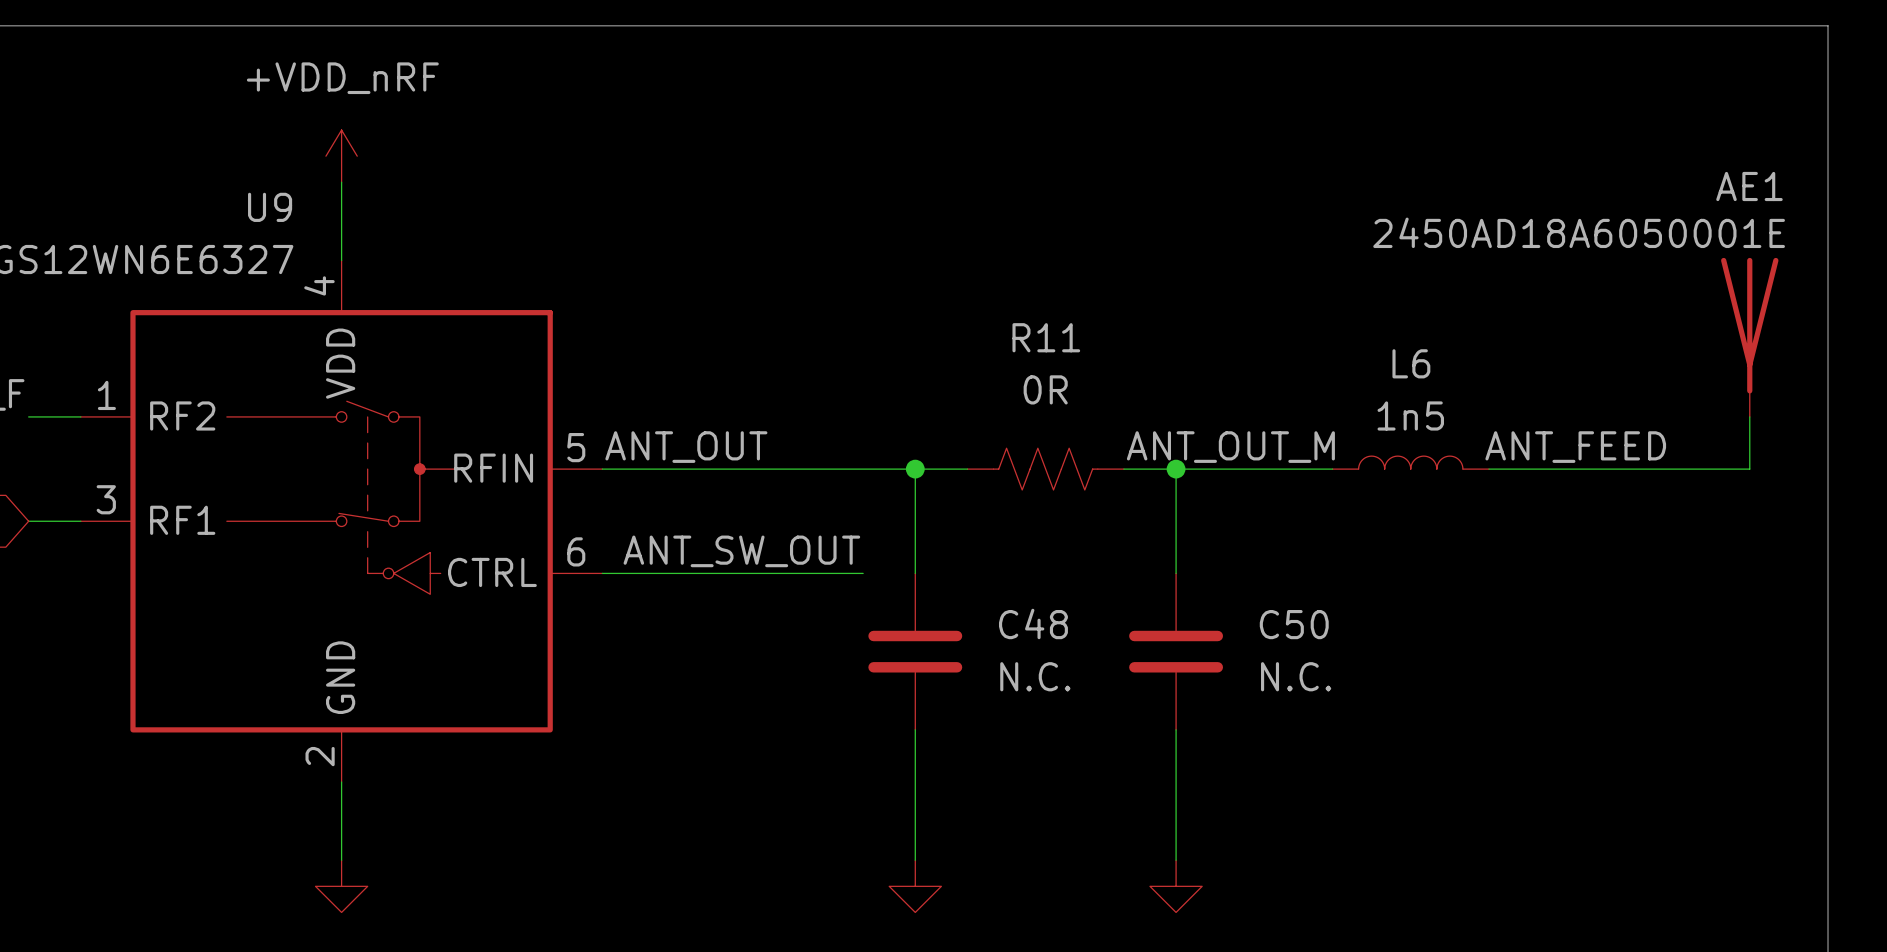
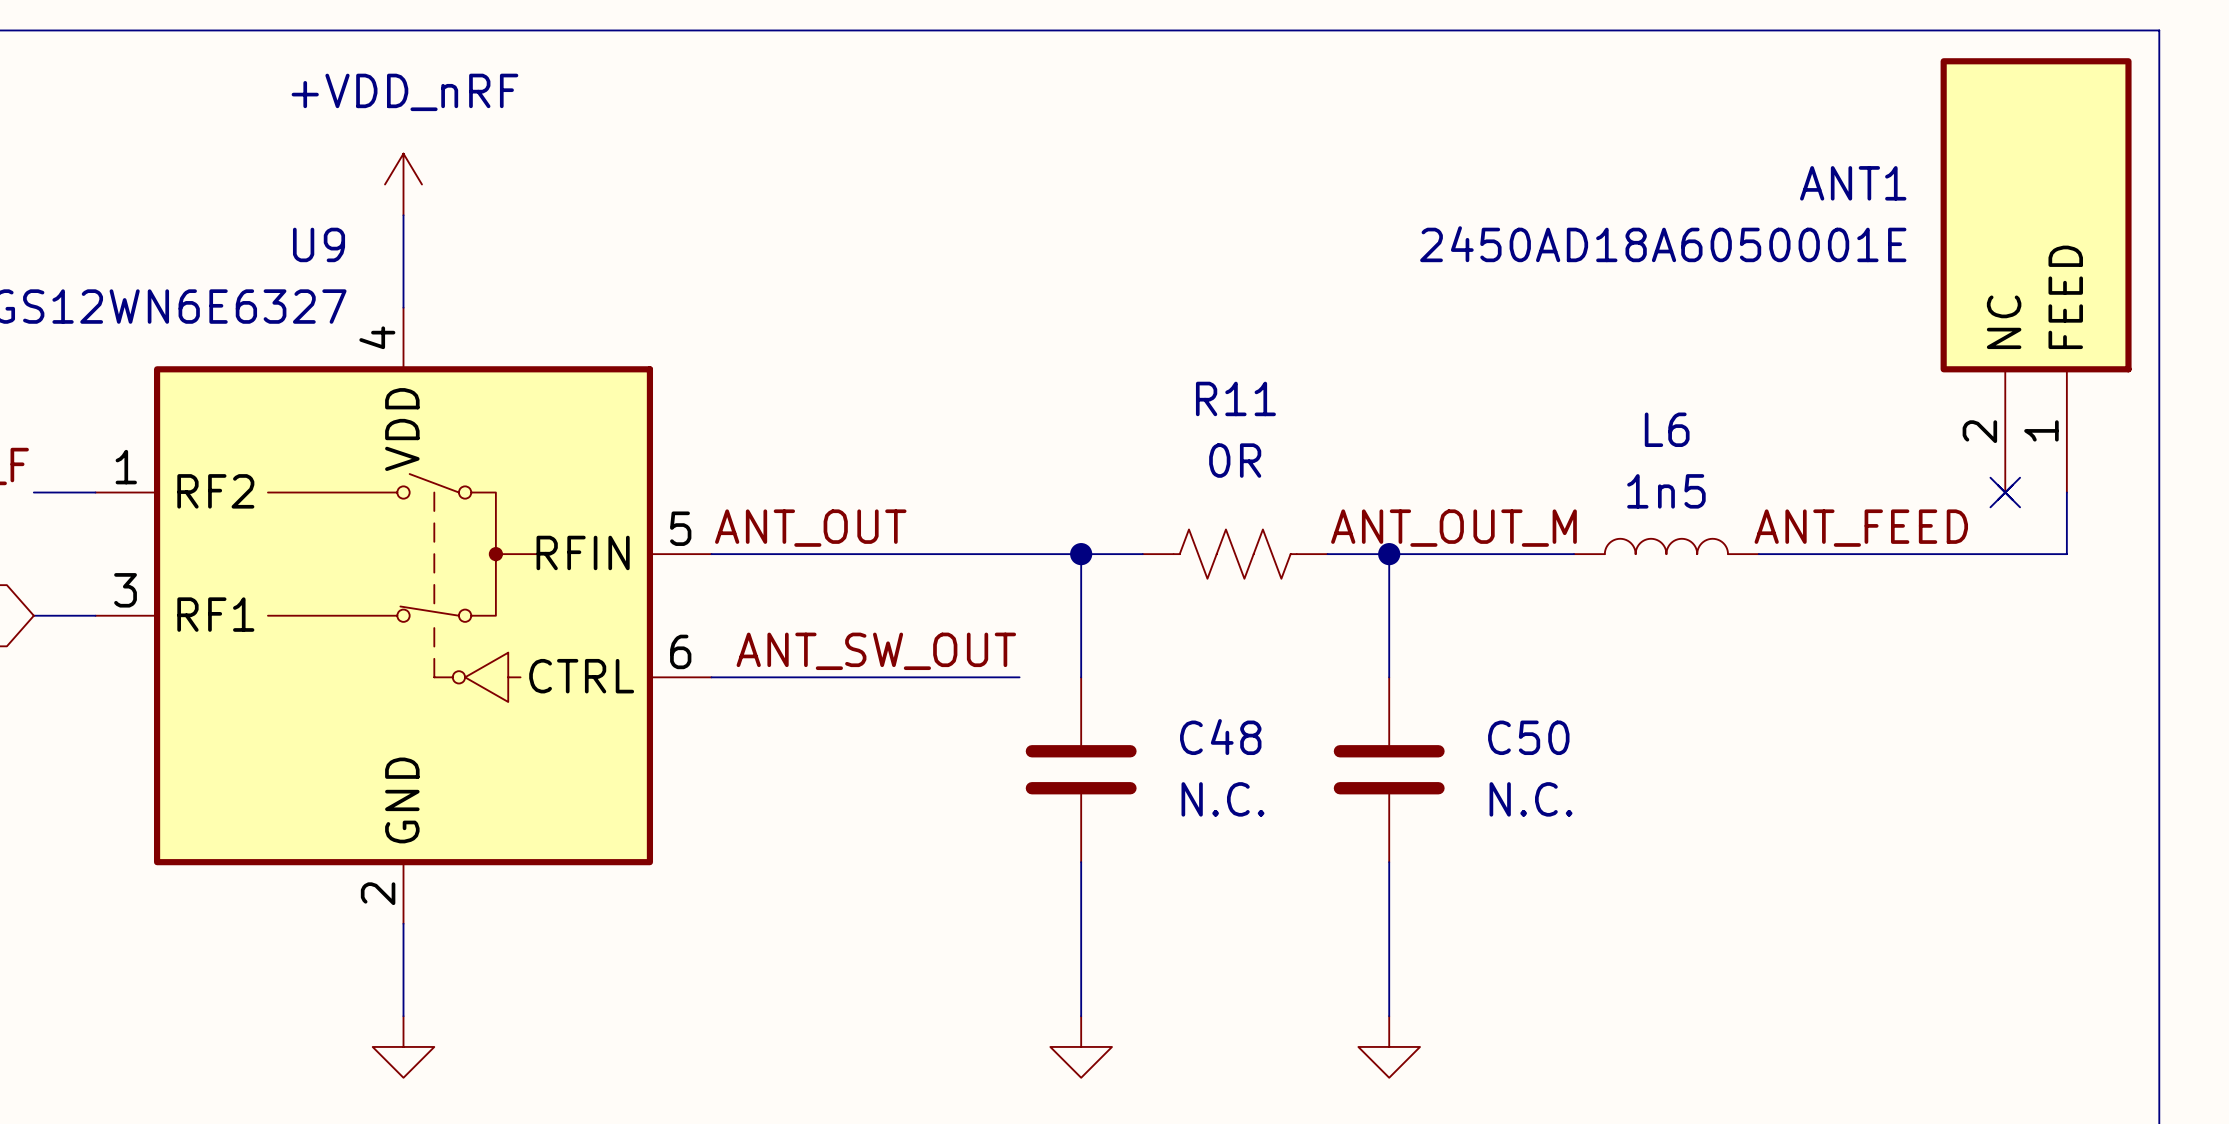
ANT1: none -> 2450AD18A6050001E (2036, 278)
AE1: 2450AD18A6050001E (1749, 337) -> none
no-connect mark: none -> (2005, 492)

